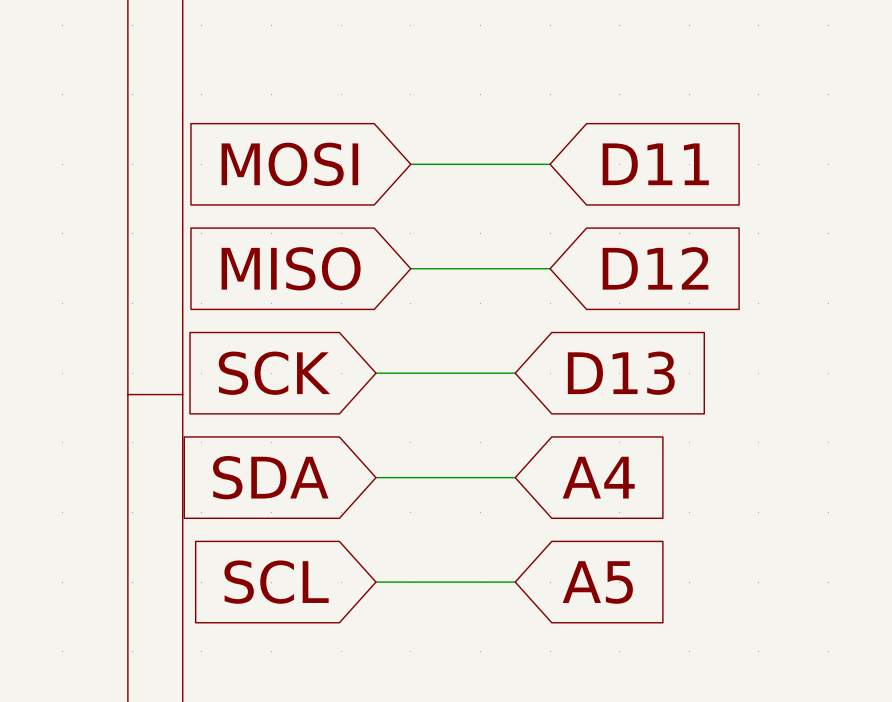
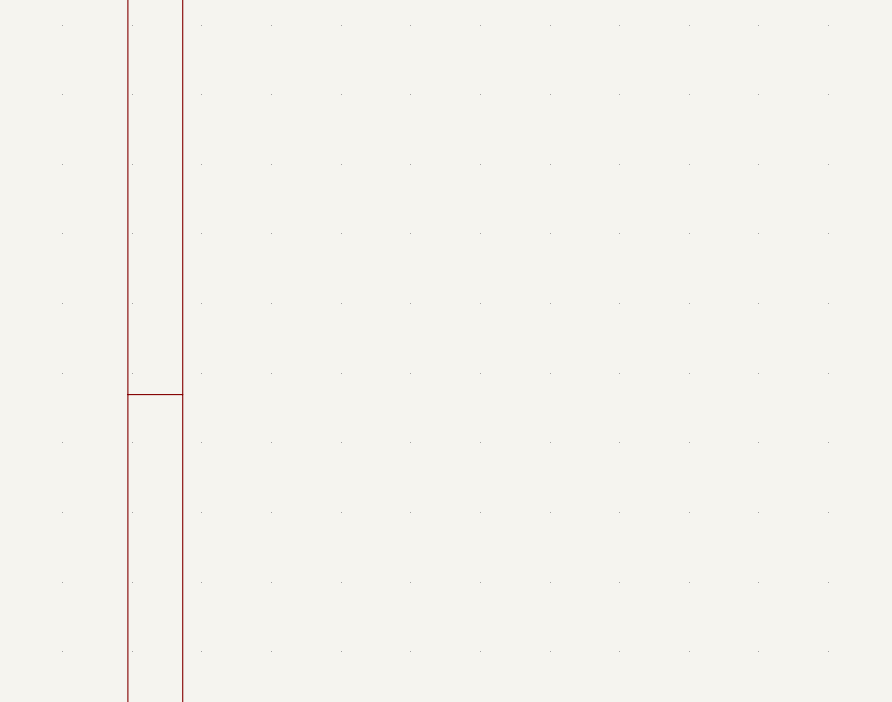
global label: MOSI (289, 164) -> none
wire: (410, 164) (550, 164) -> none
global label: D11 (655, 164) -> none
global label: MISO (291, 268) -> none
wire: (410, 268) (550, 268) -> none
global label: D12 (655, 268) -> none
global label: SCK (274, 373) -> none
wire: (375, 373) (515, 373) -> none
global label: D13 (621, 373) -> none
global label: SDA (270, 477) -> none
wire: (375, 477) (515, 477) -> none
global label: A4 (598, 477) -> none
global label: SCL (276, 582) -> none
wire: (375, 582) (515, 582) -> none
global label: A5 (597, 582) -> none

